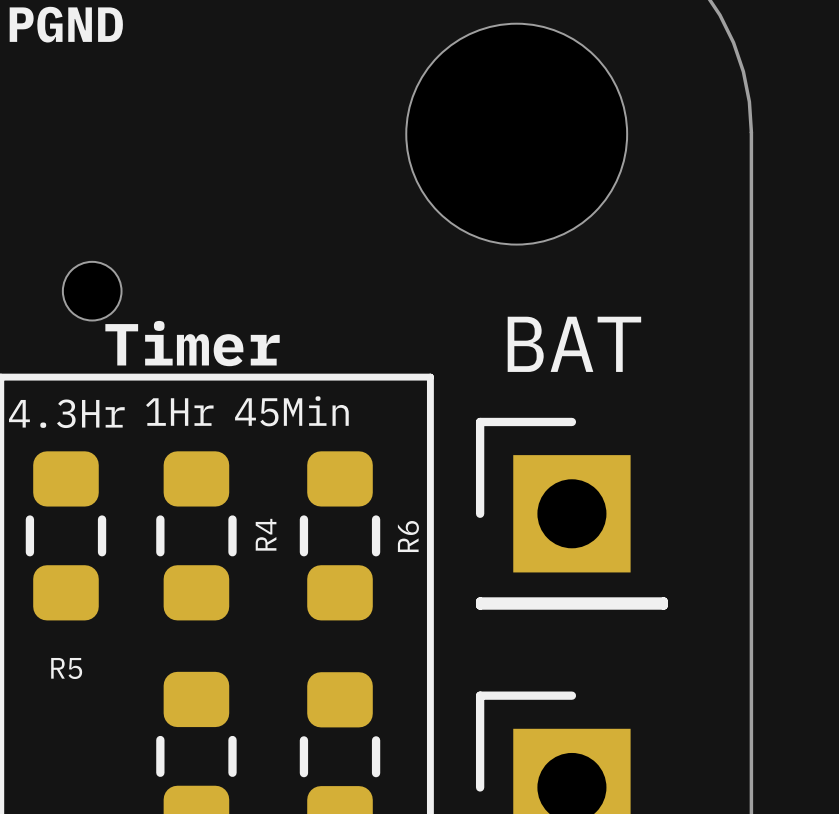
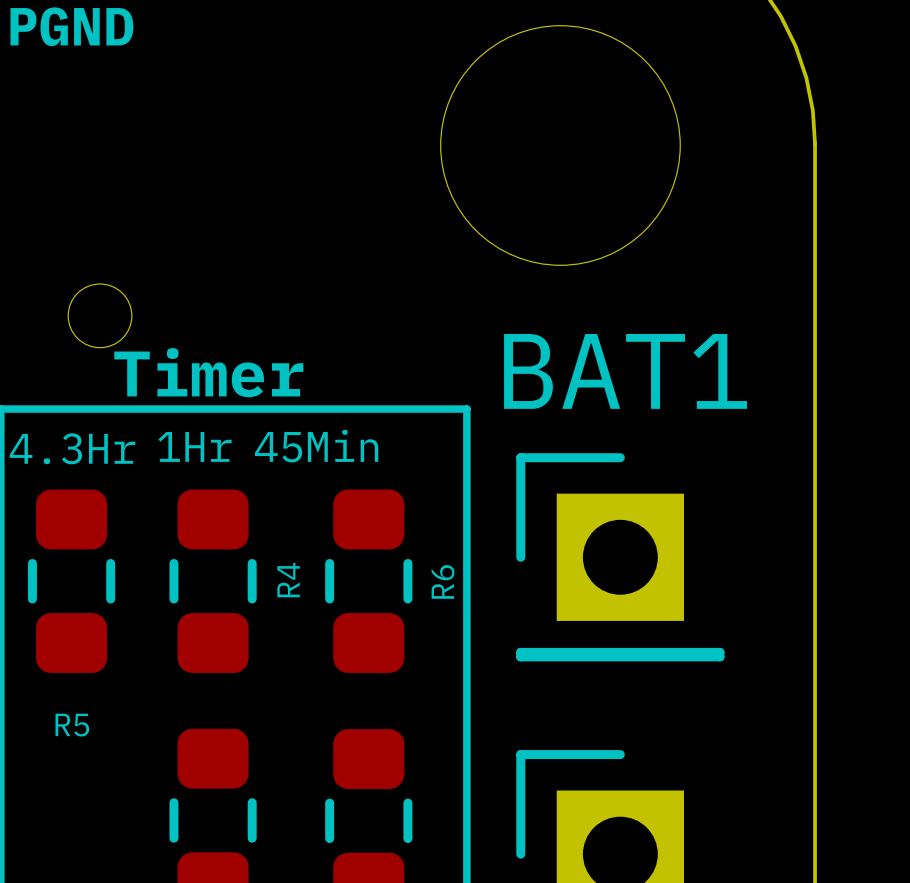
BAT1 name: none -> BAT1 (625, 371)
text: BAT (574, 344) -> none

